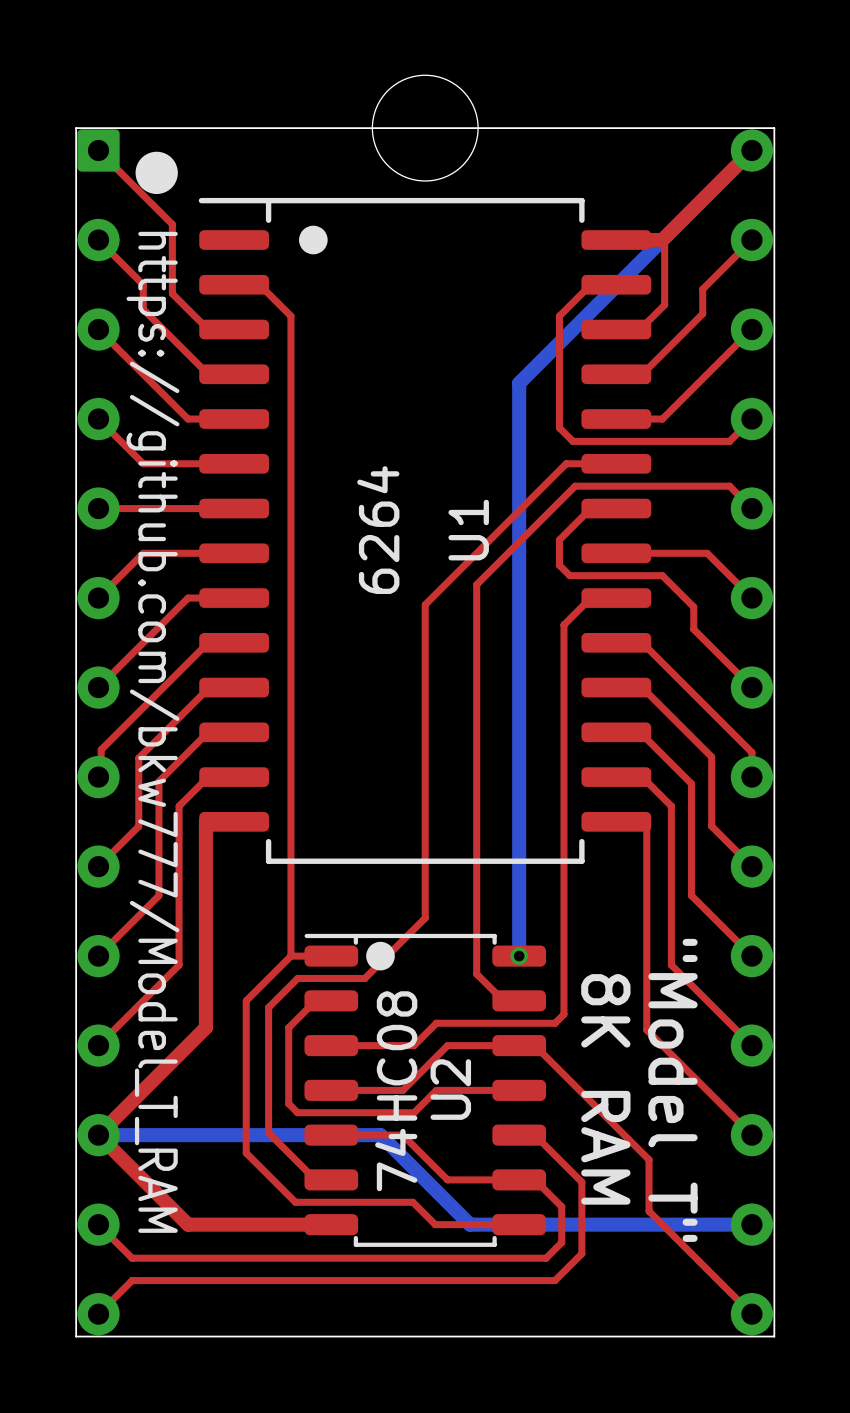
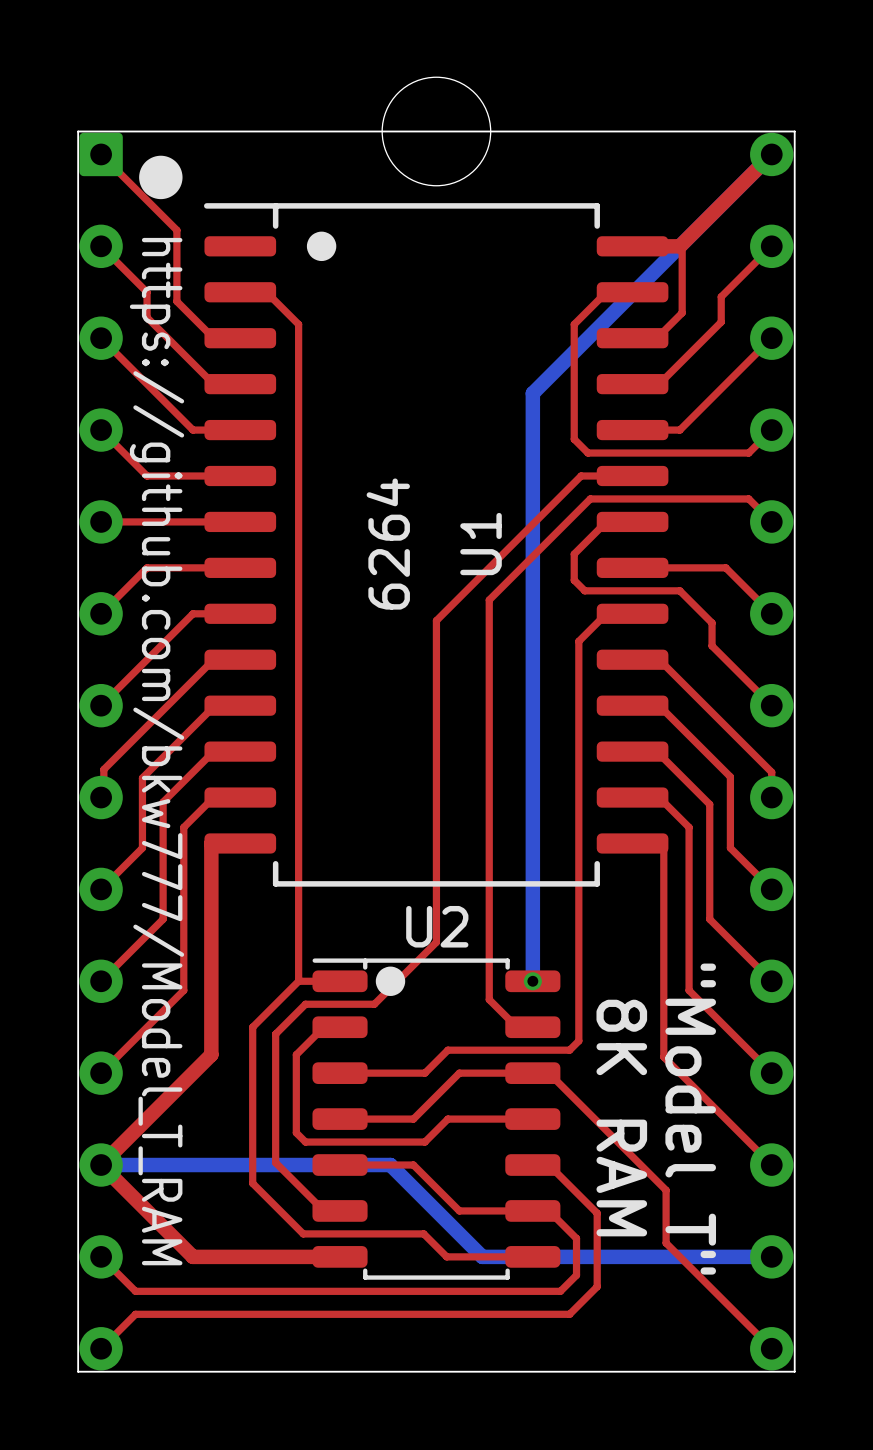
U2 name rotation: 0° (450, 1089) -> 90° clockwise (437, 926)
U2 name position: U2 (450, 1089) -> U2 (437, 926)
U2 value: 74HC08 (396, 1091) -> none

